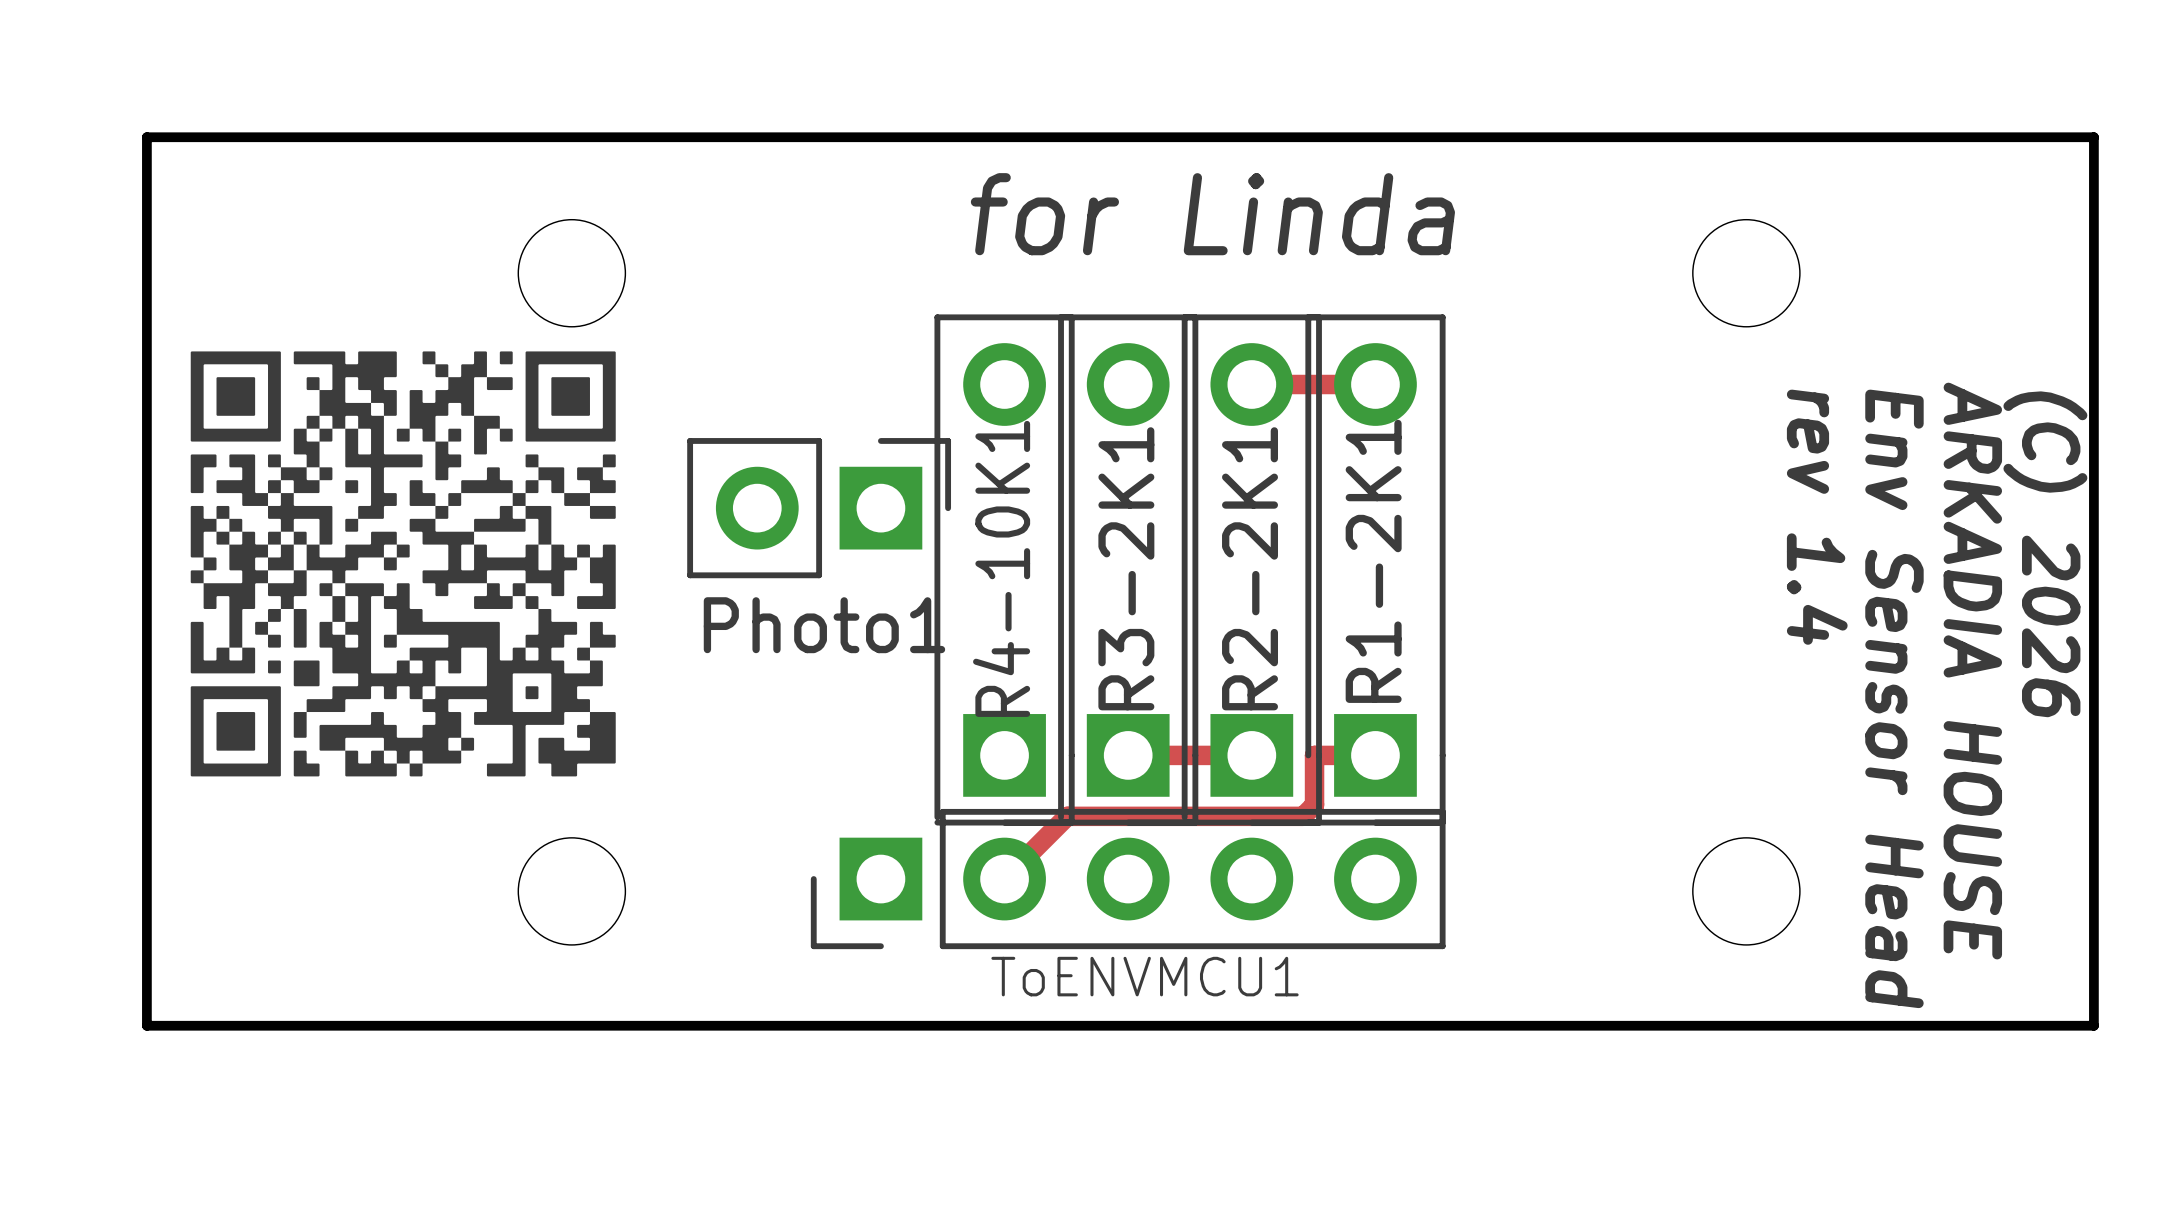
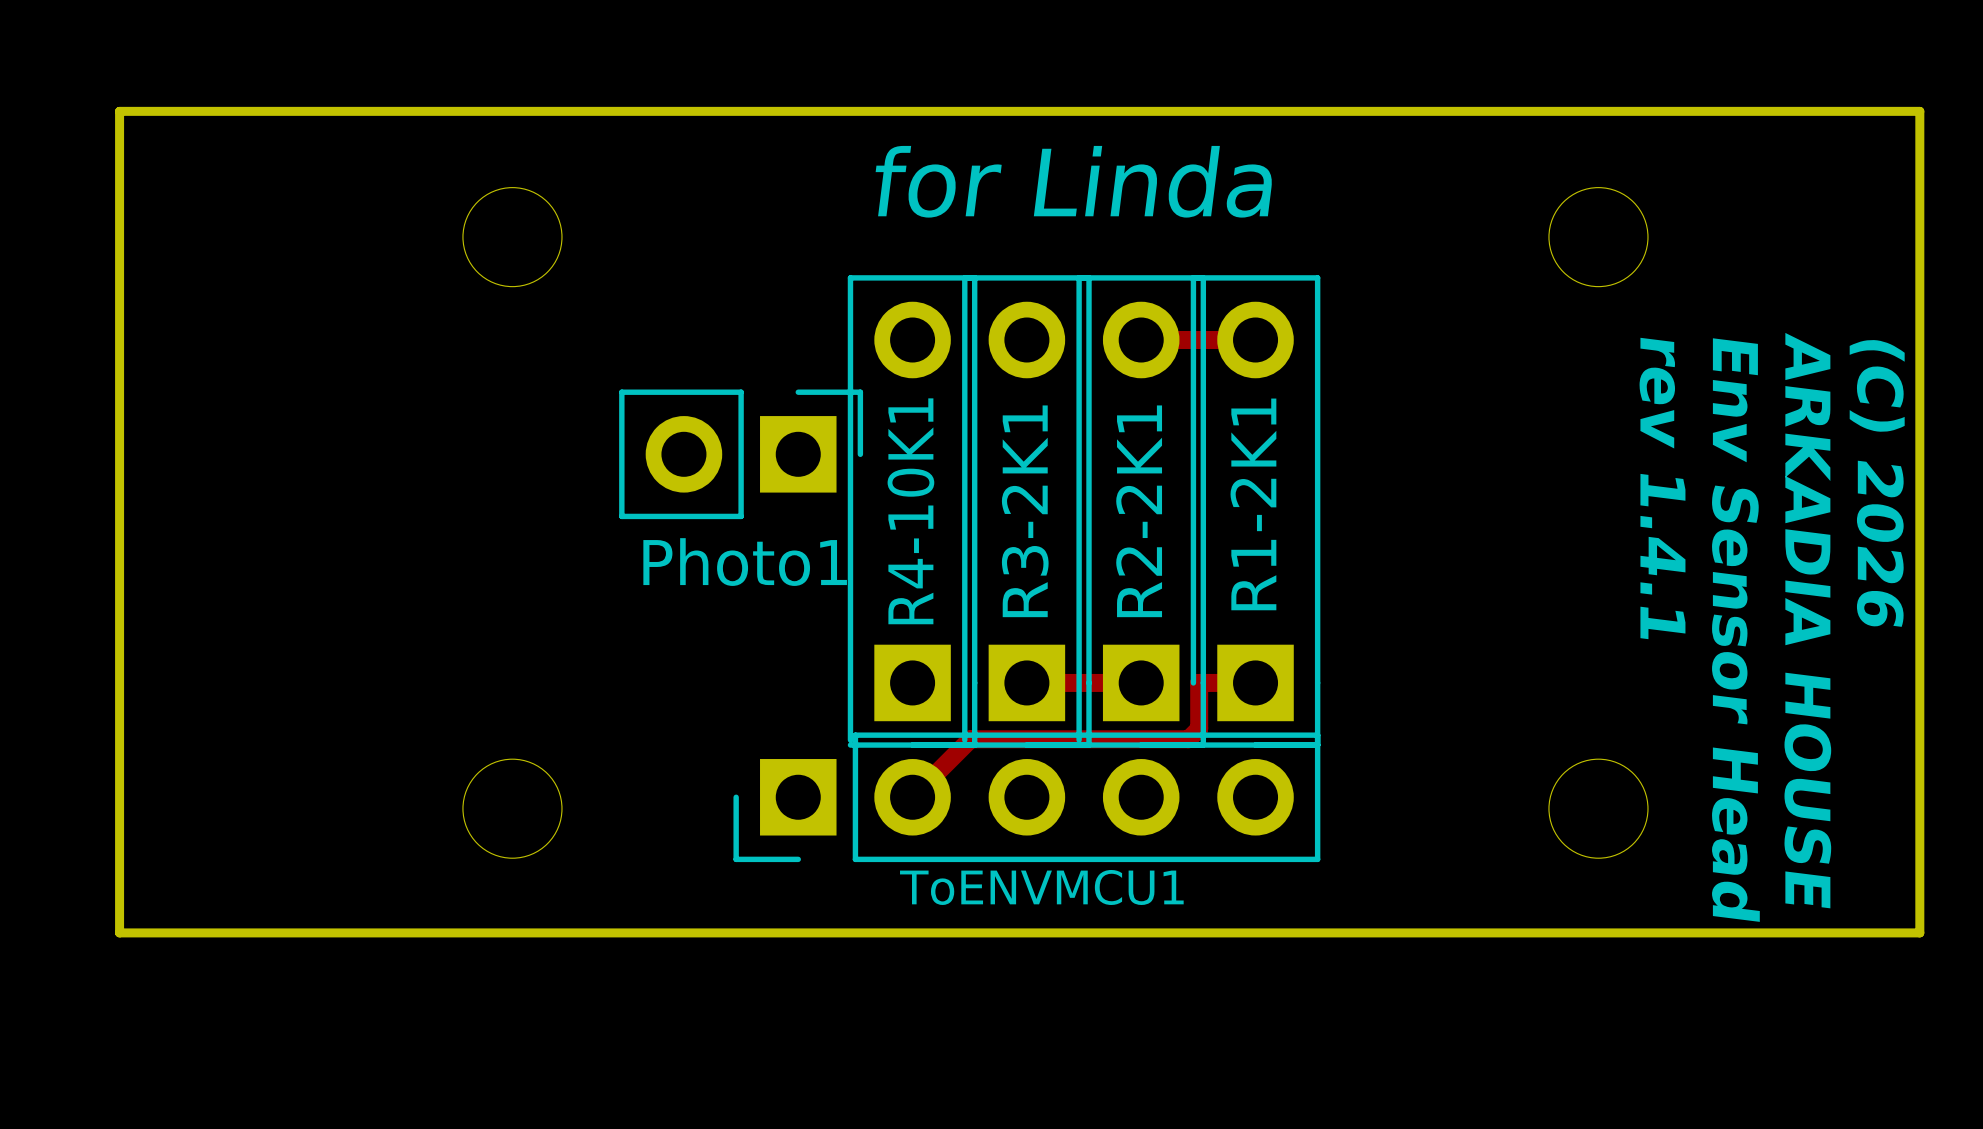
drawing: [190, 351, 616, 777] -> none
text: rev 1.4 (1817, 517) -> rev 1.4.1 (1662, 488)

